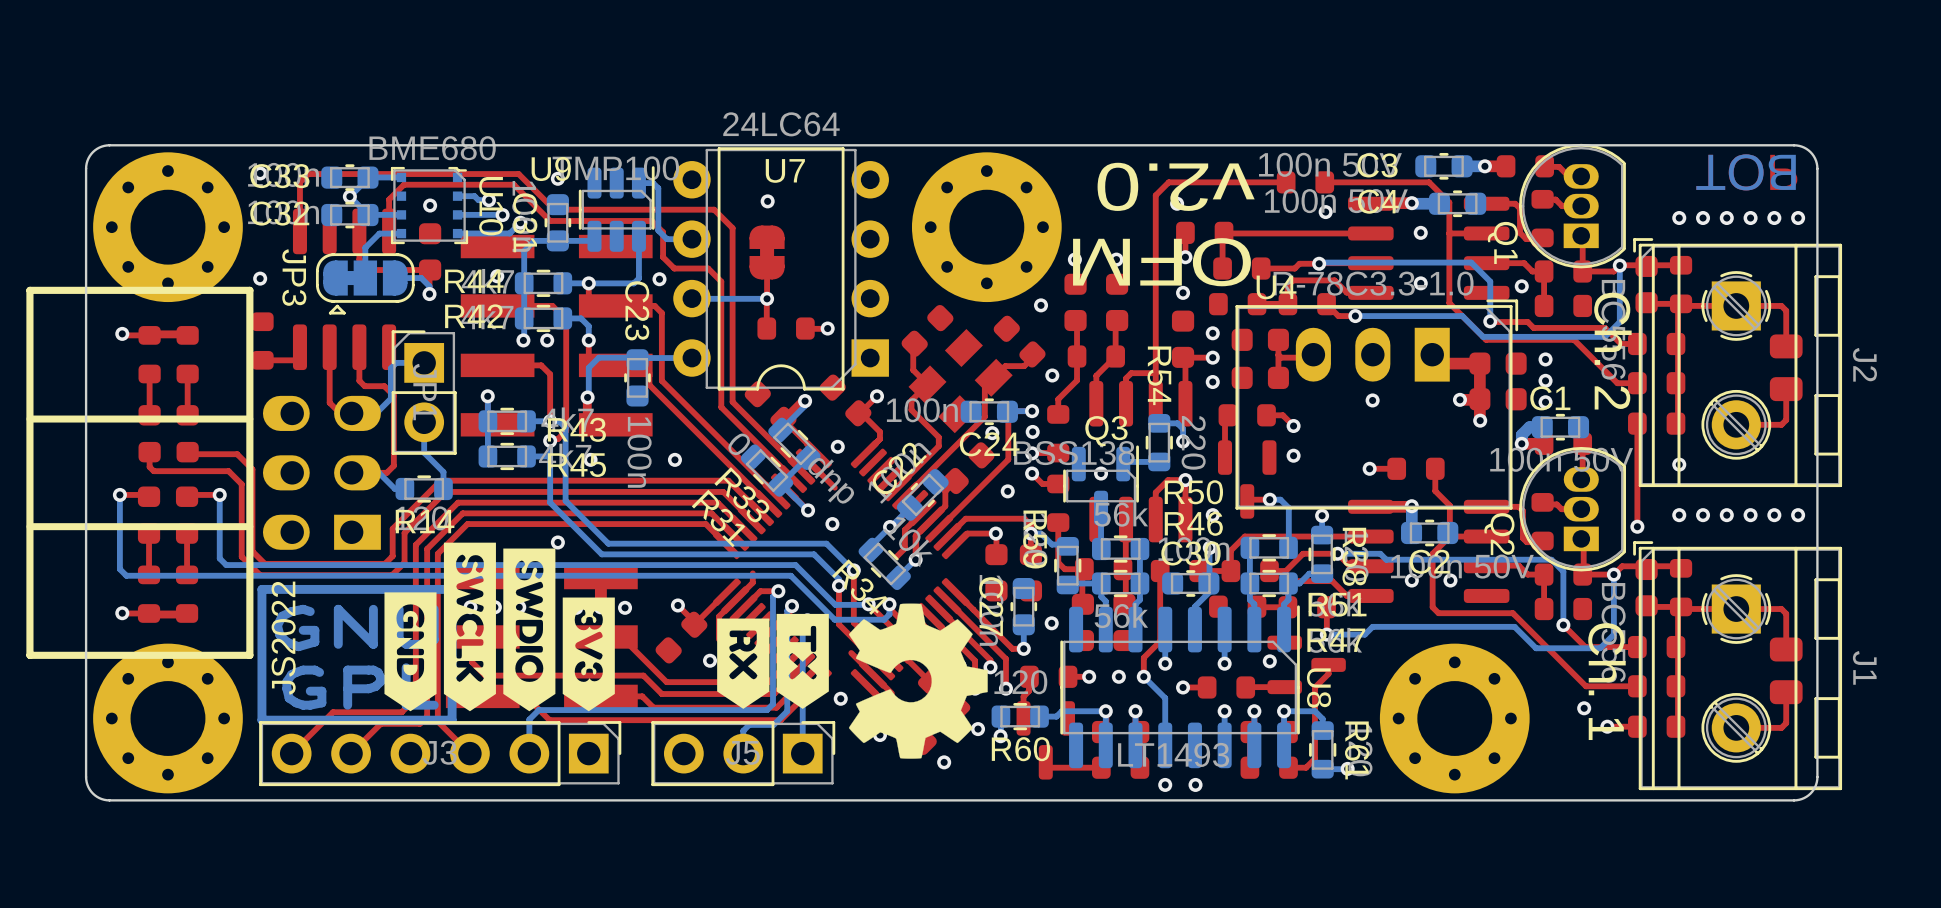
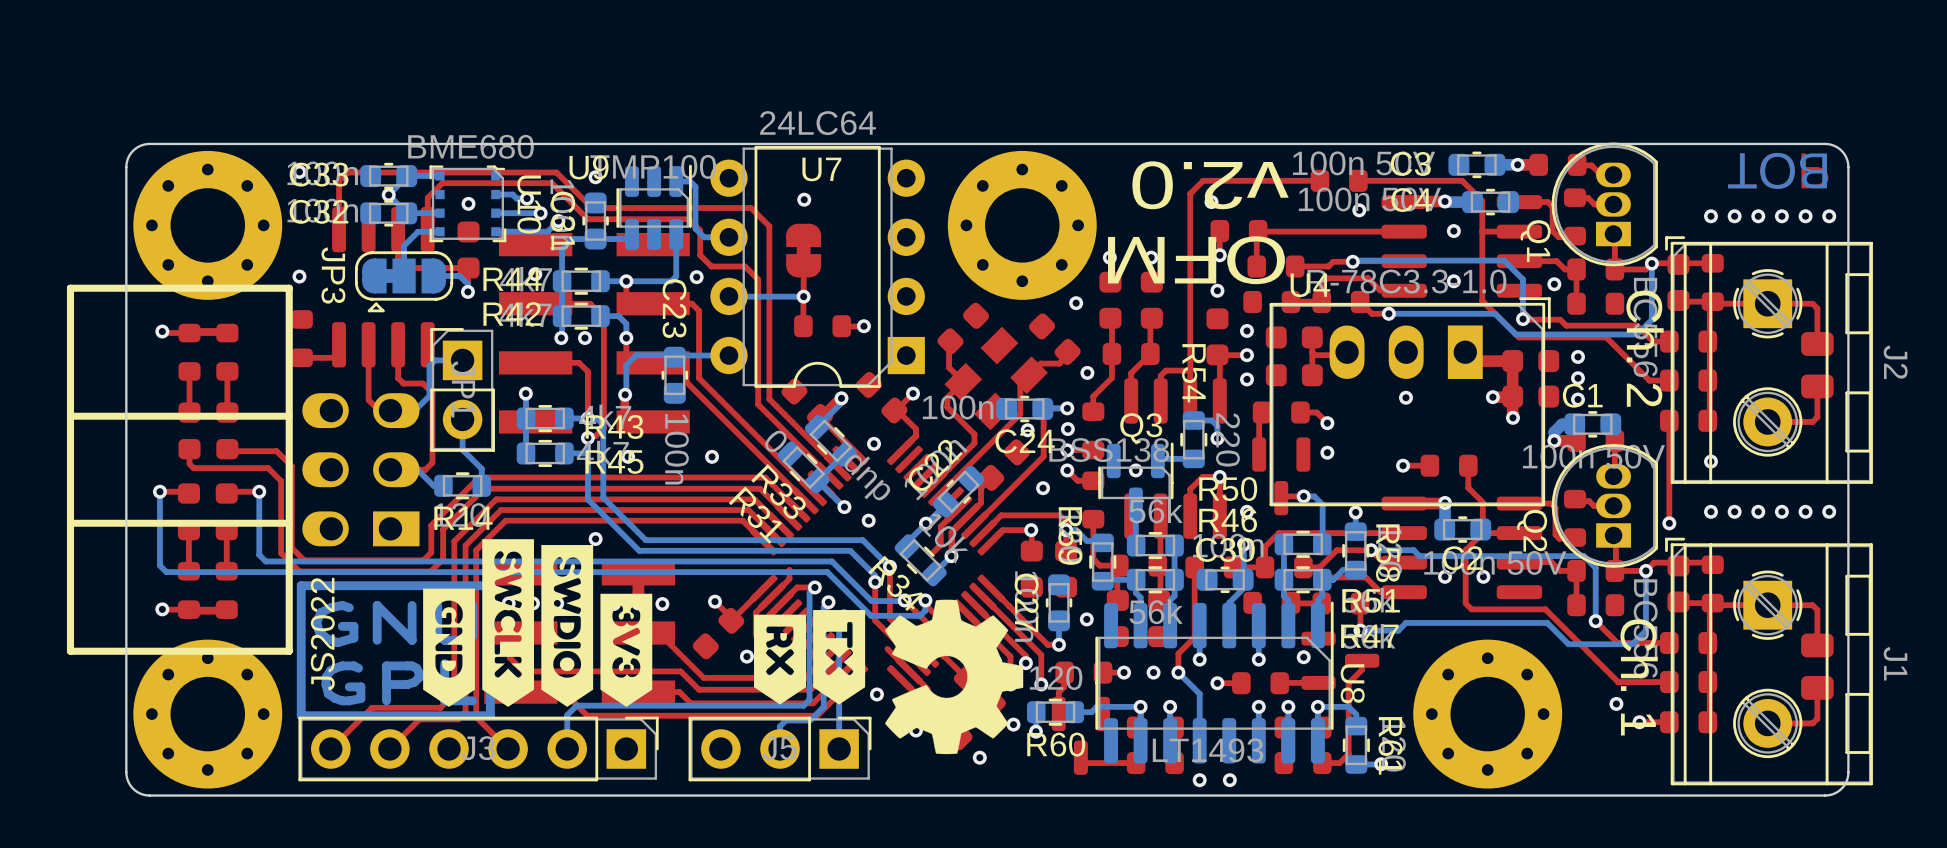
top track: (809, 462) (834, 487) -> none

